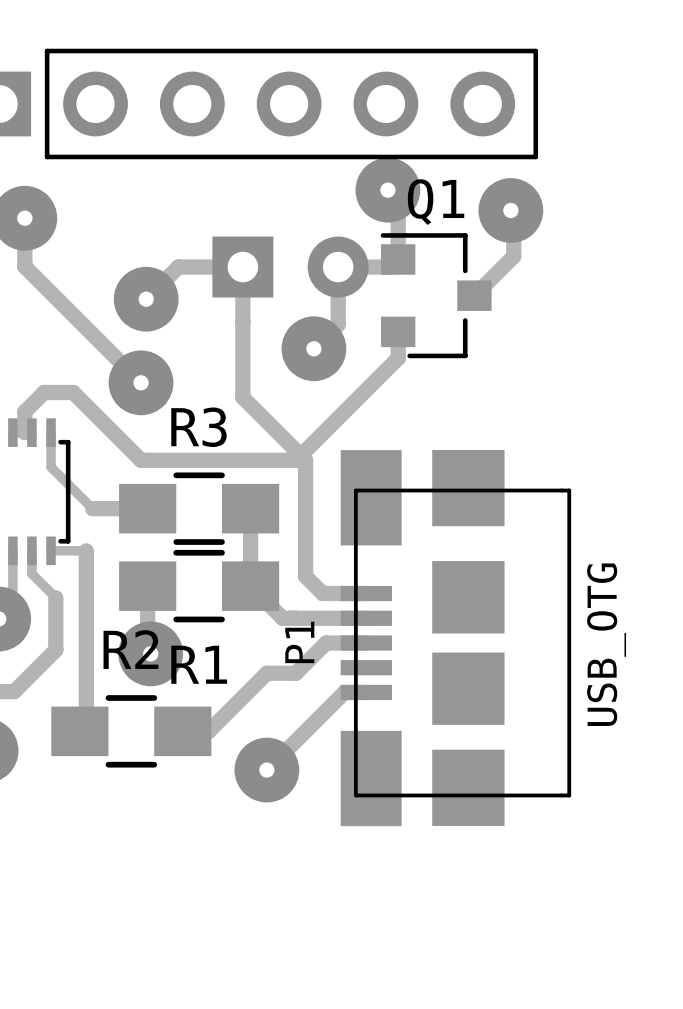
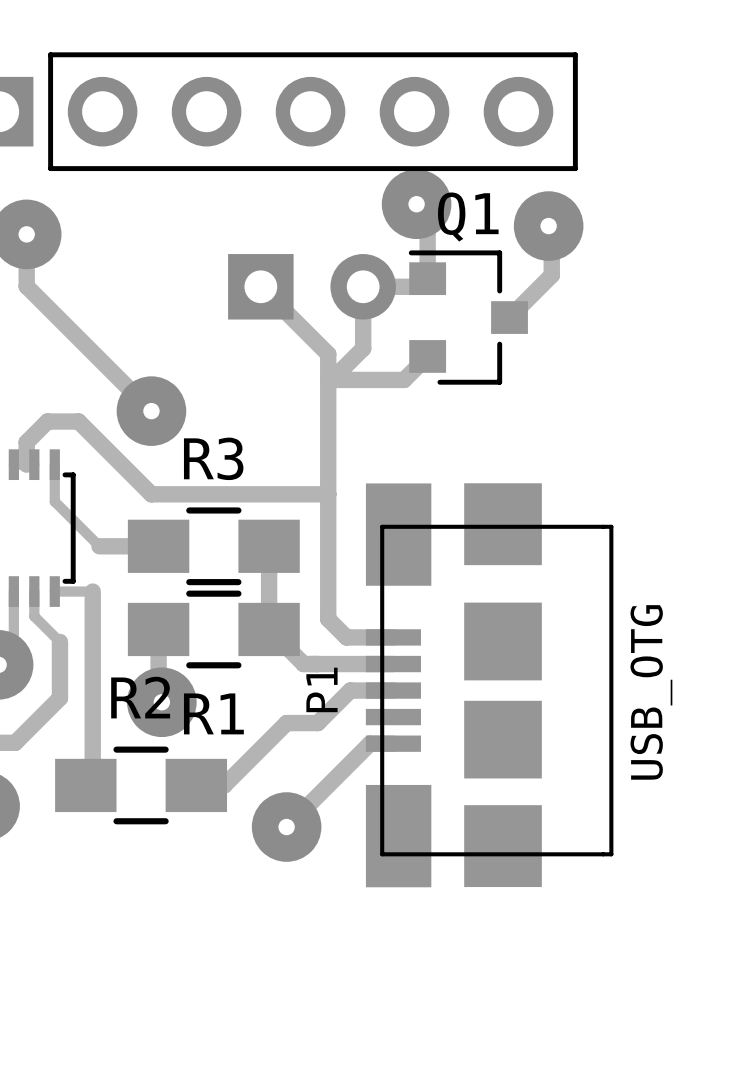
track: none -> (260, 286) (328, 354) (328, 494)
track: (146, 299) (178, 267) (242, 267) (242, 397) (303, 457) -> none
via: (146, 299) -> none
track: (398, 331) (398, 358) (303, 453) (303, 460) -> (427, 356) (404, 379) (328, 379)
via: (313, 348) -> none

